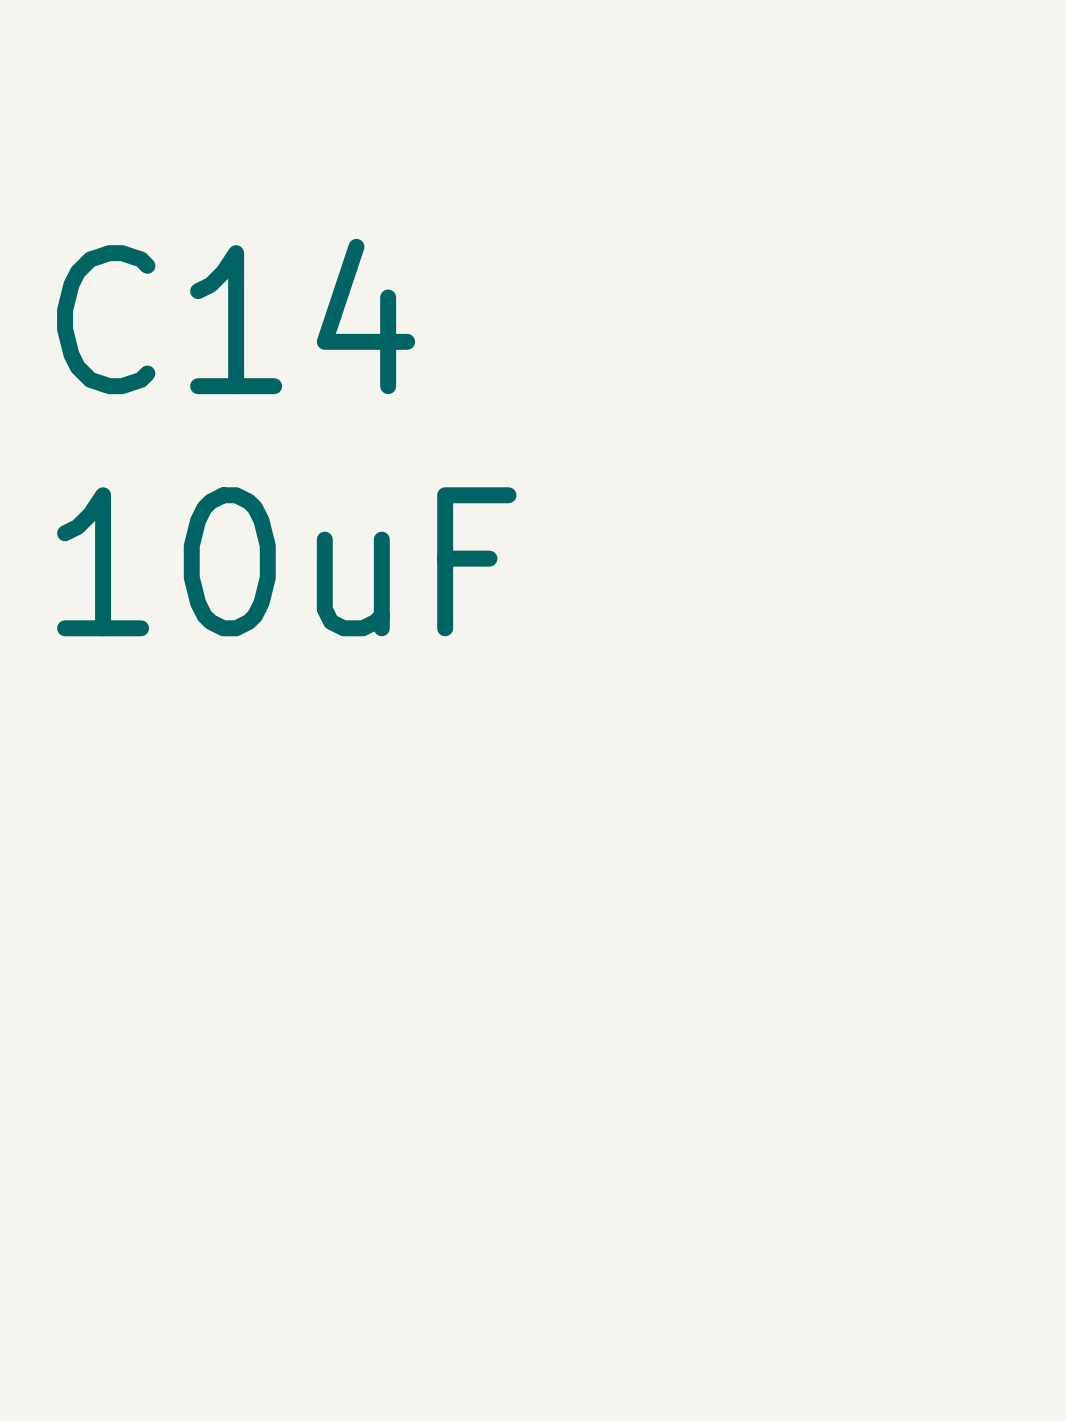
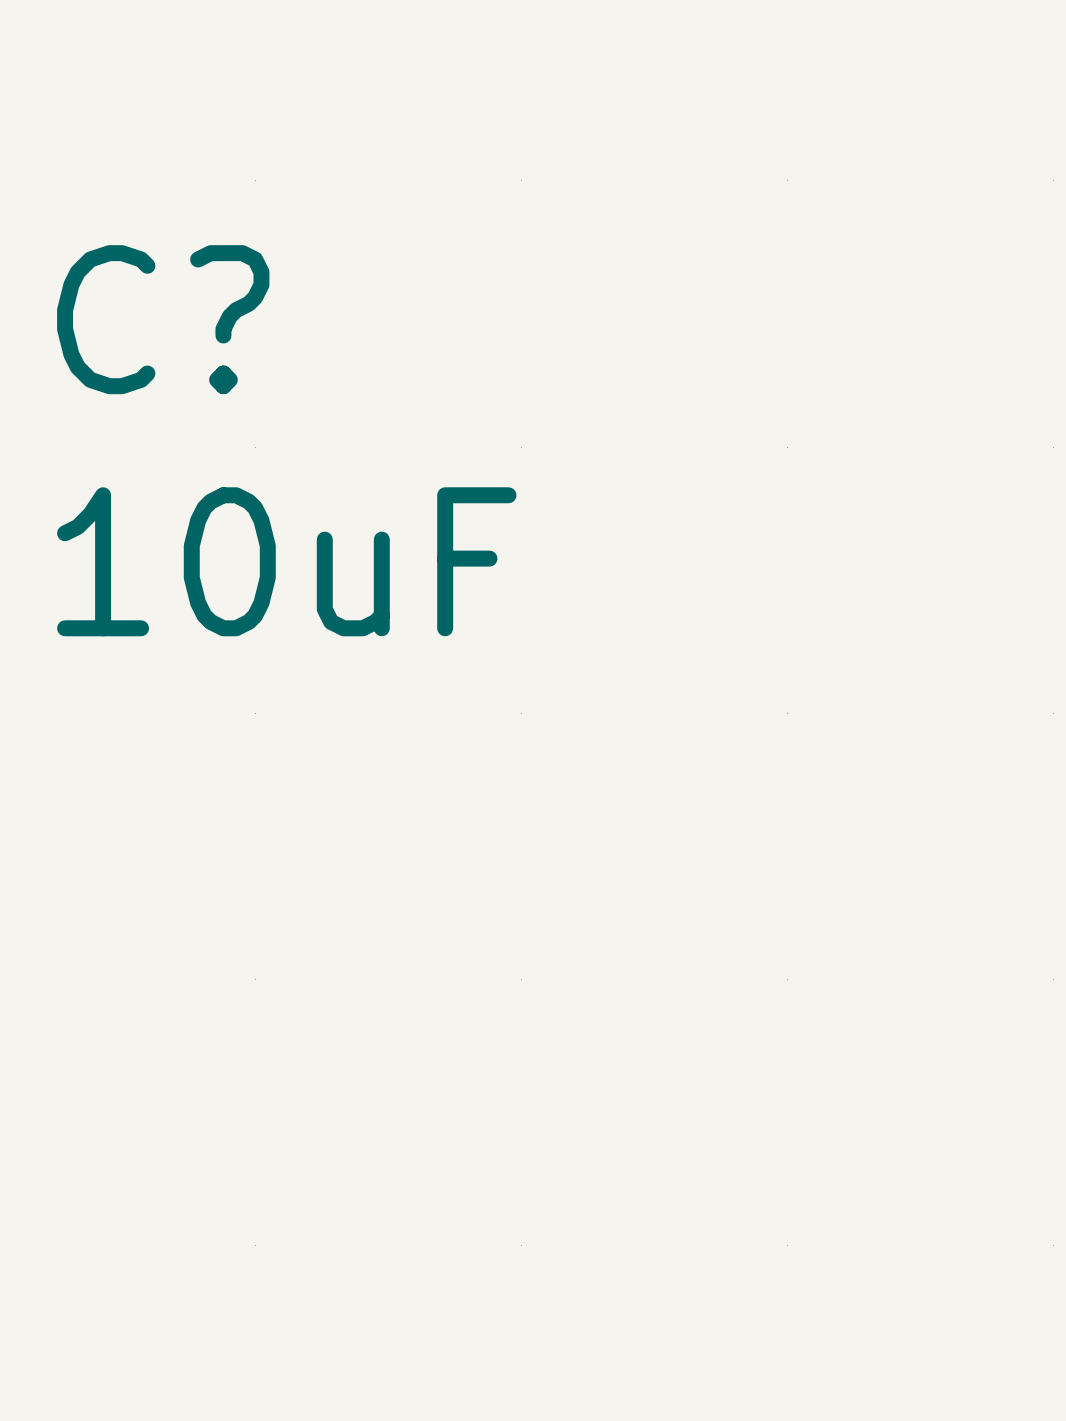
C14 name: C14 (236, 316) -> C? (163, 319)

